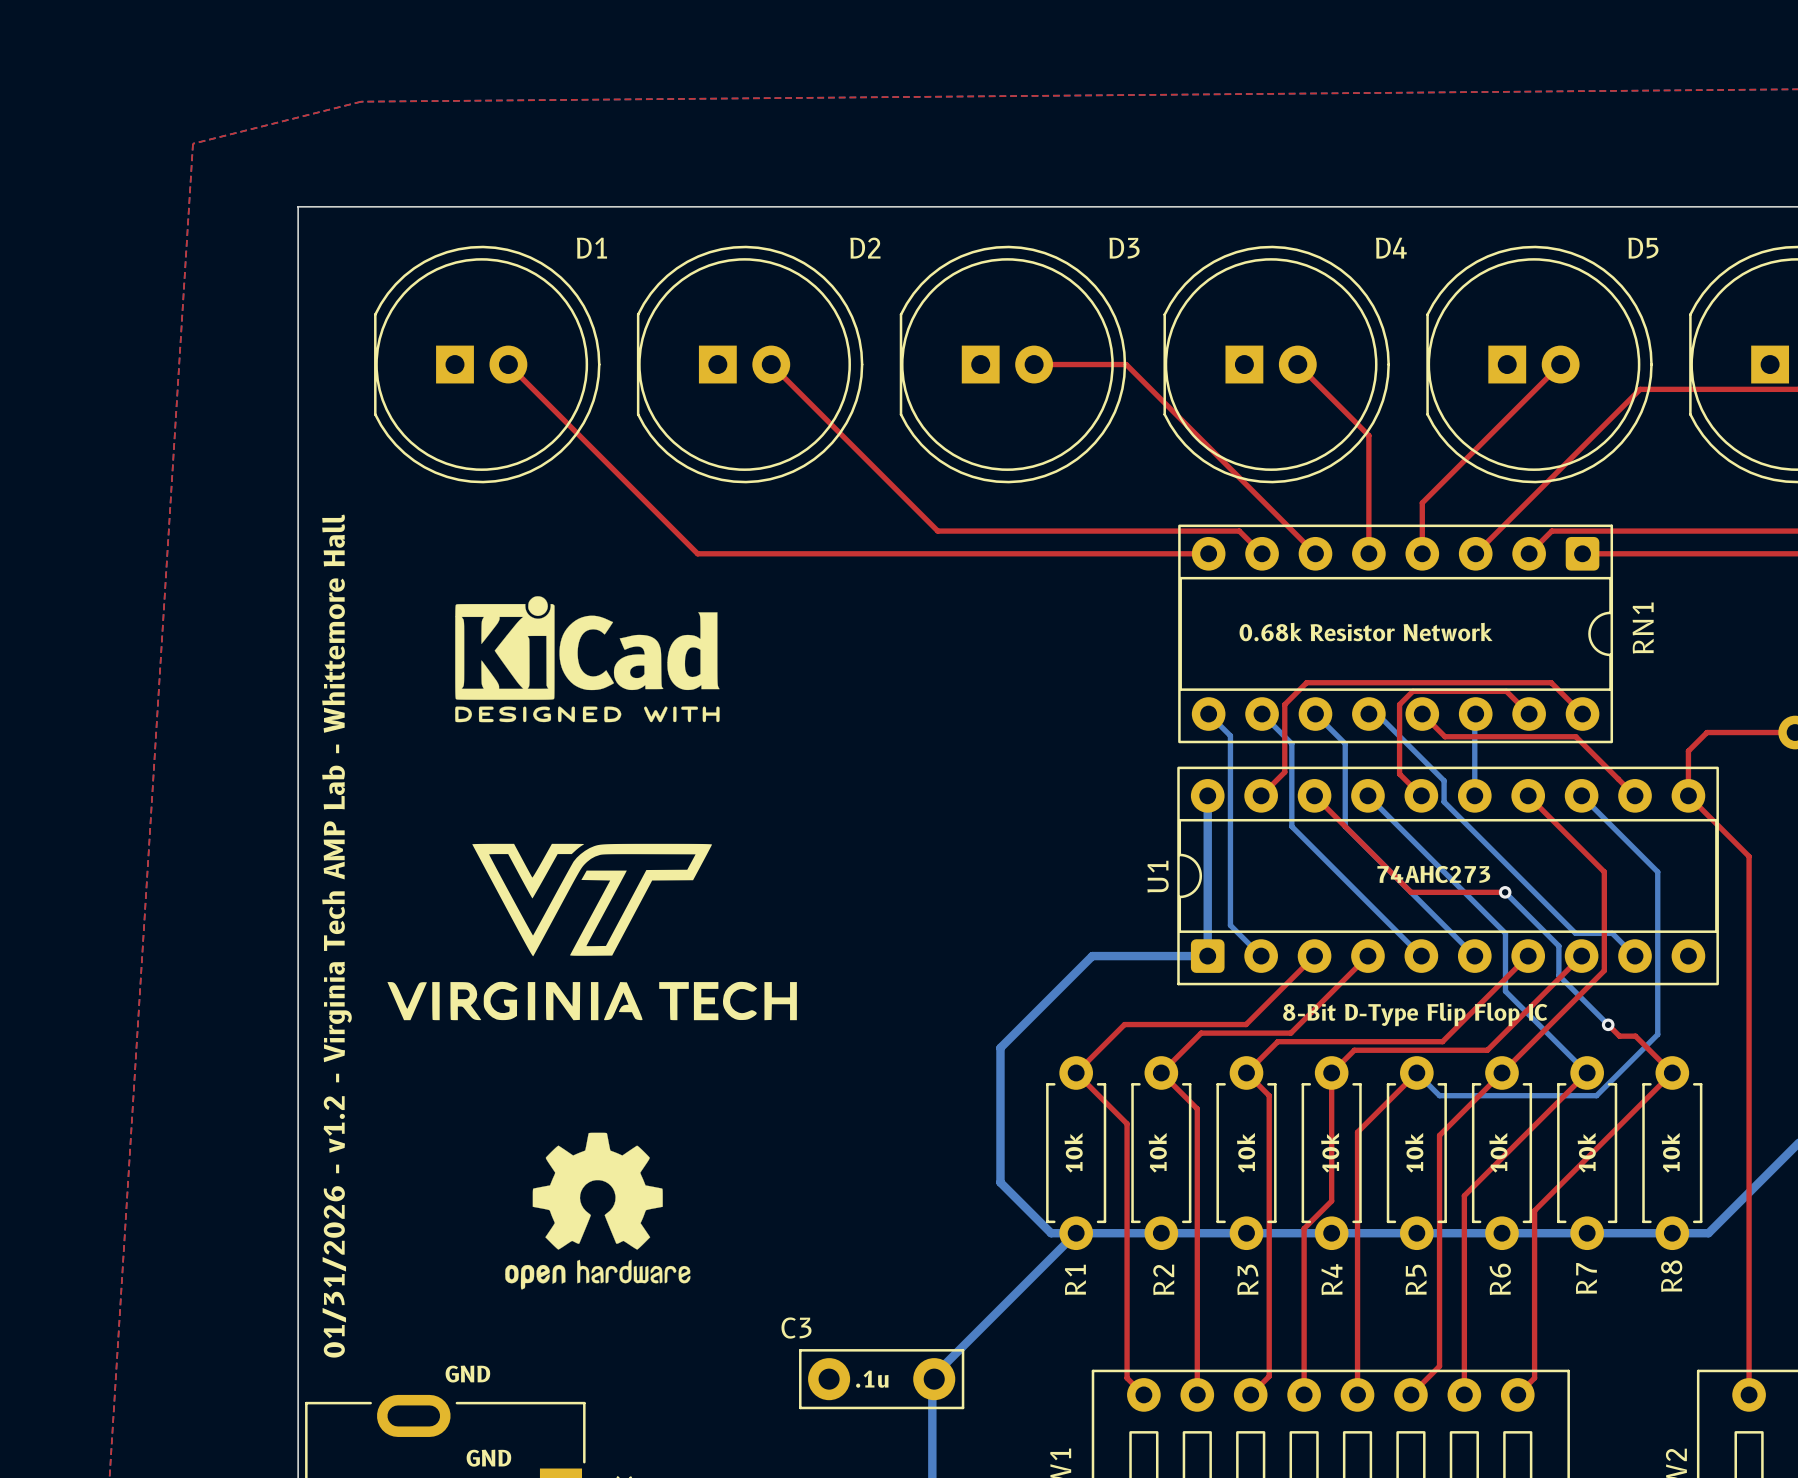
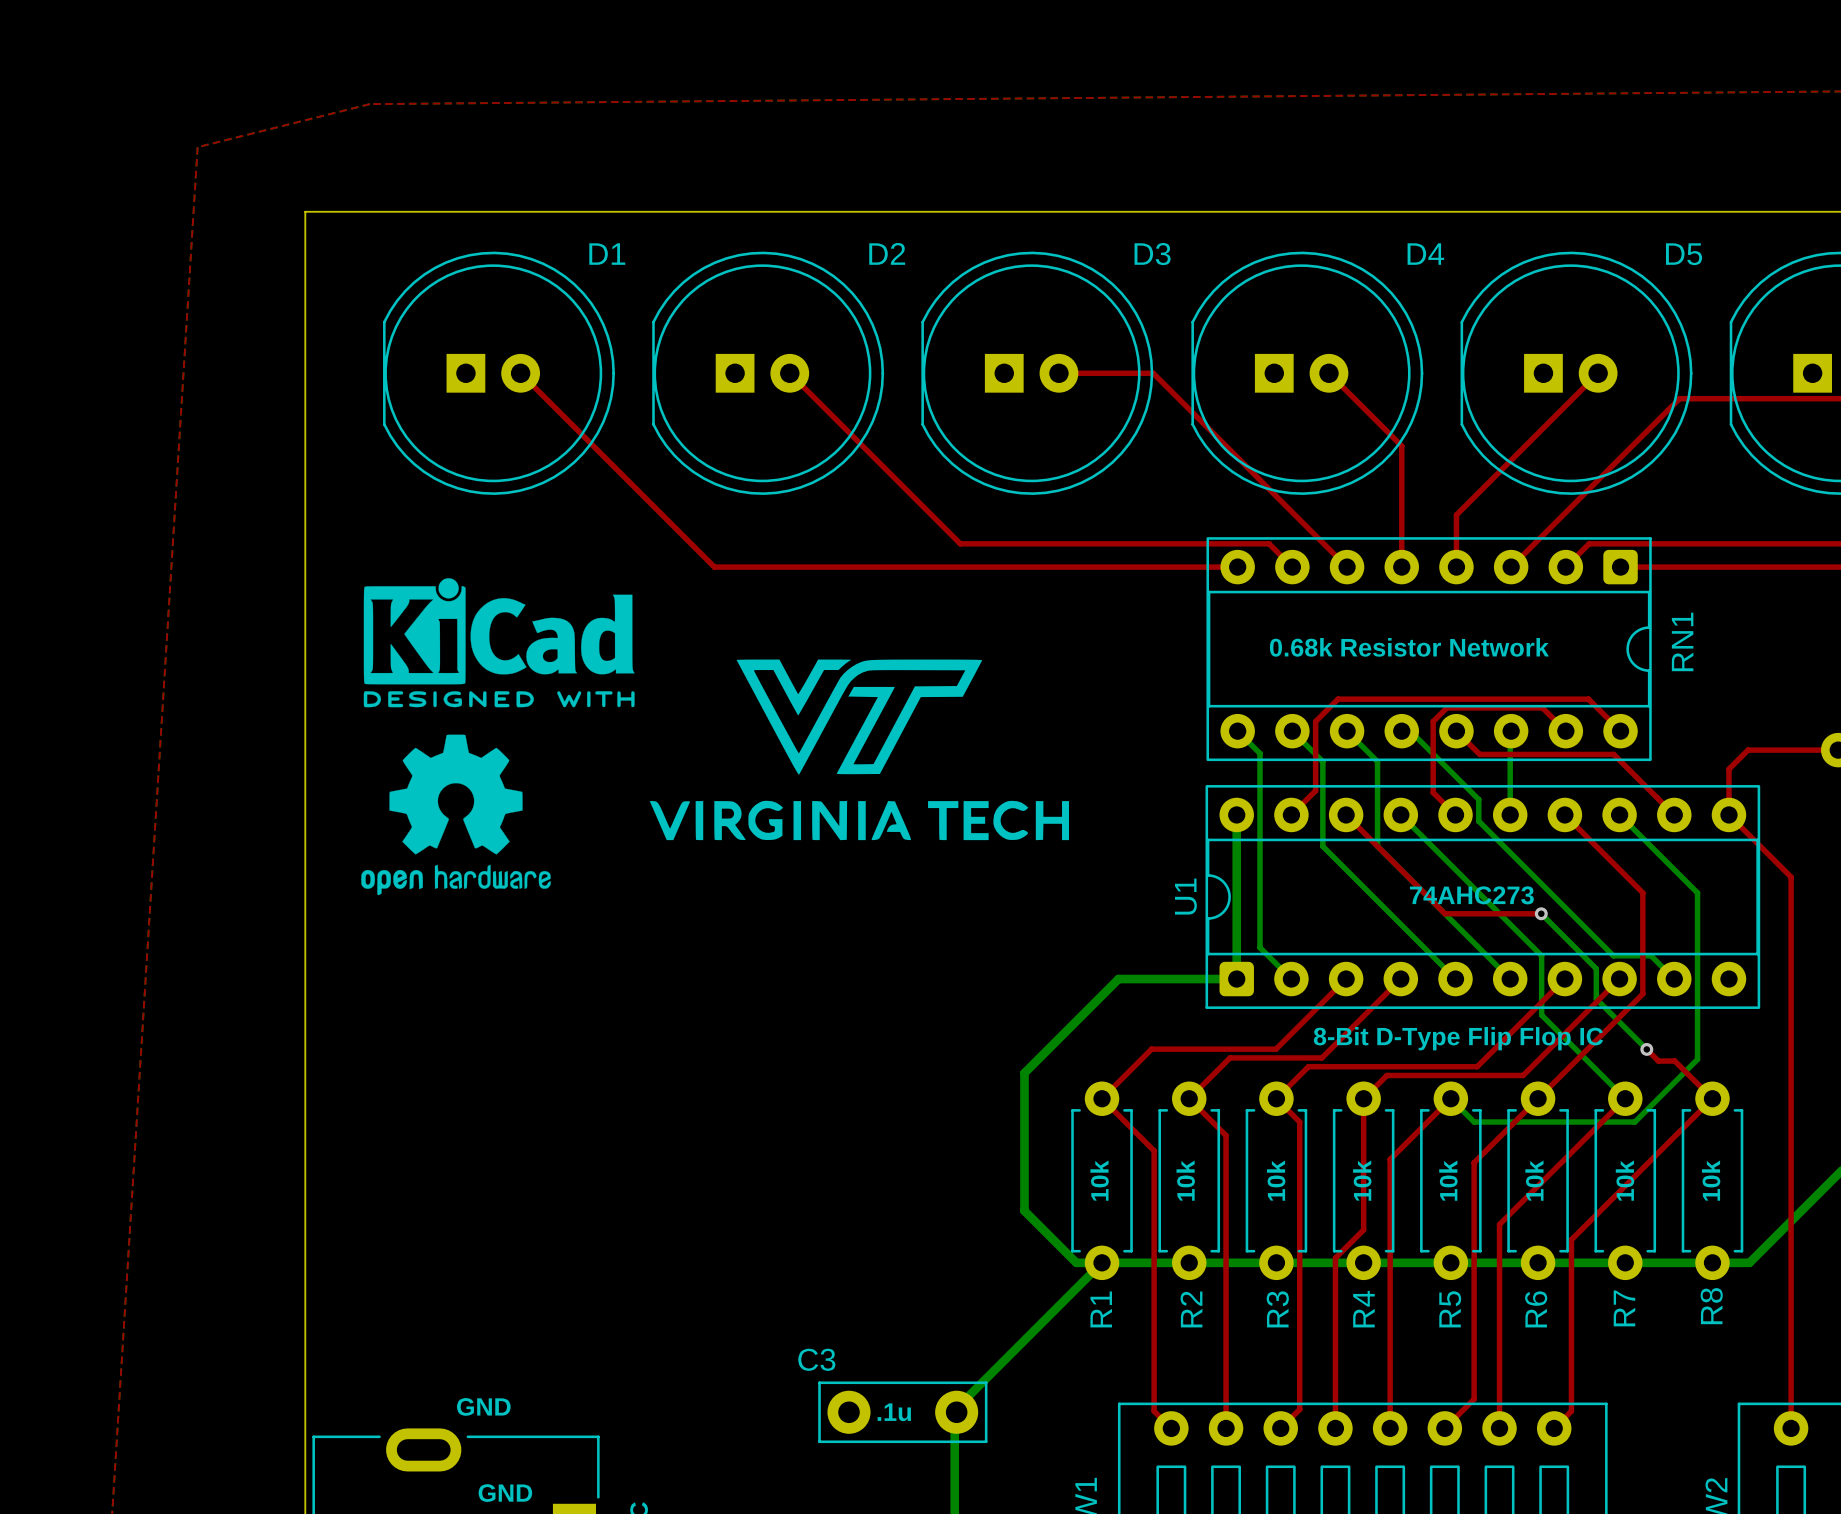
drawing position: (587, 659) -> (499, 642)
drawing position: (592, 932) -> (859, 749)
text: 01/31/2026 - v1.2 - Virginia Tech AMP Lab - Whittemore Hall (336, 936) -> none
drawing position: (597, 1211) -> (456, 814)

